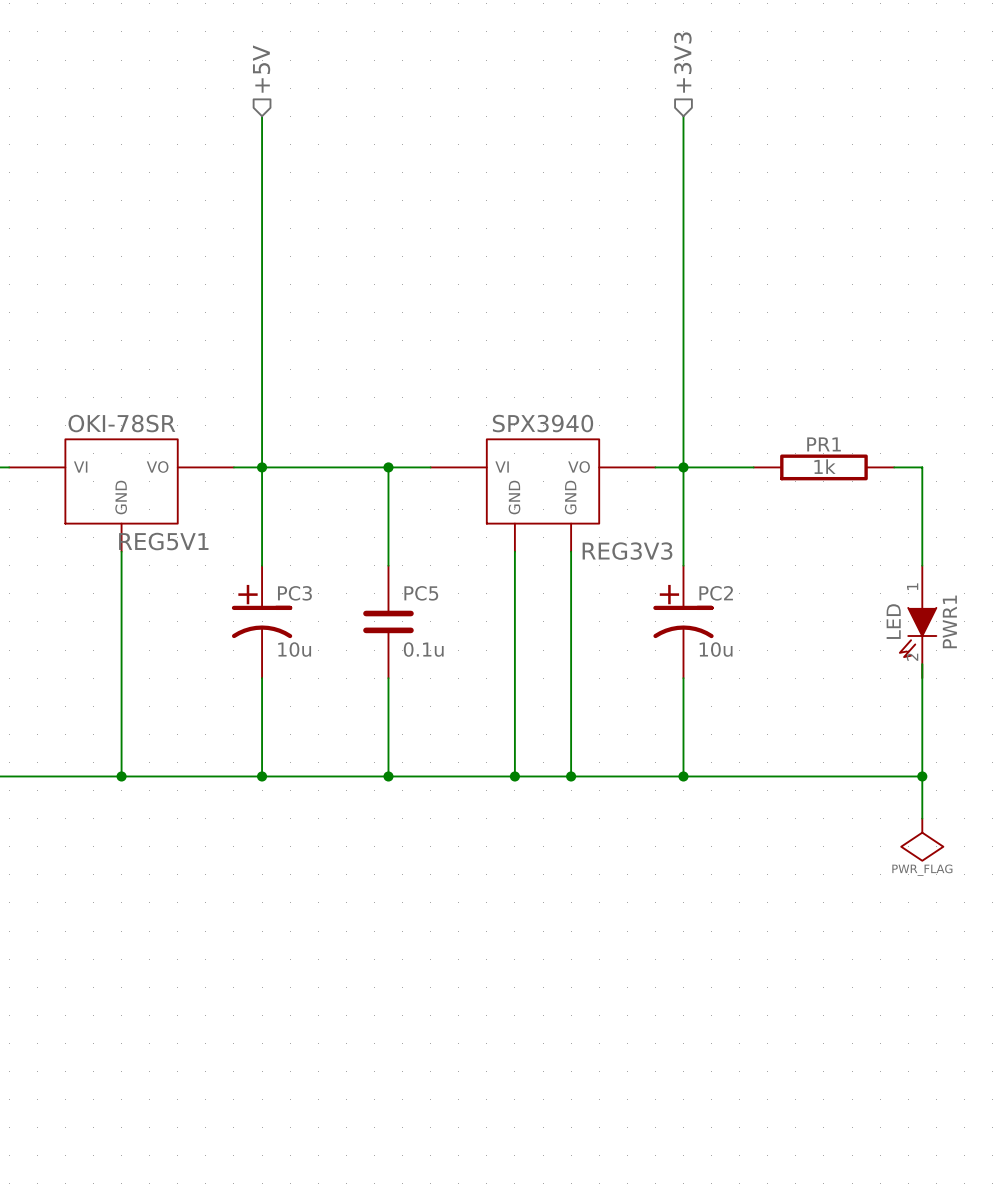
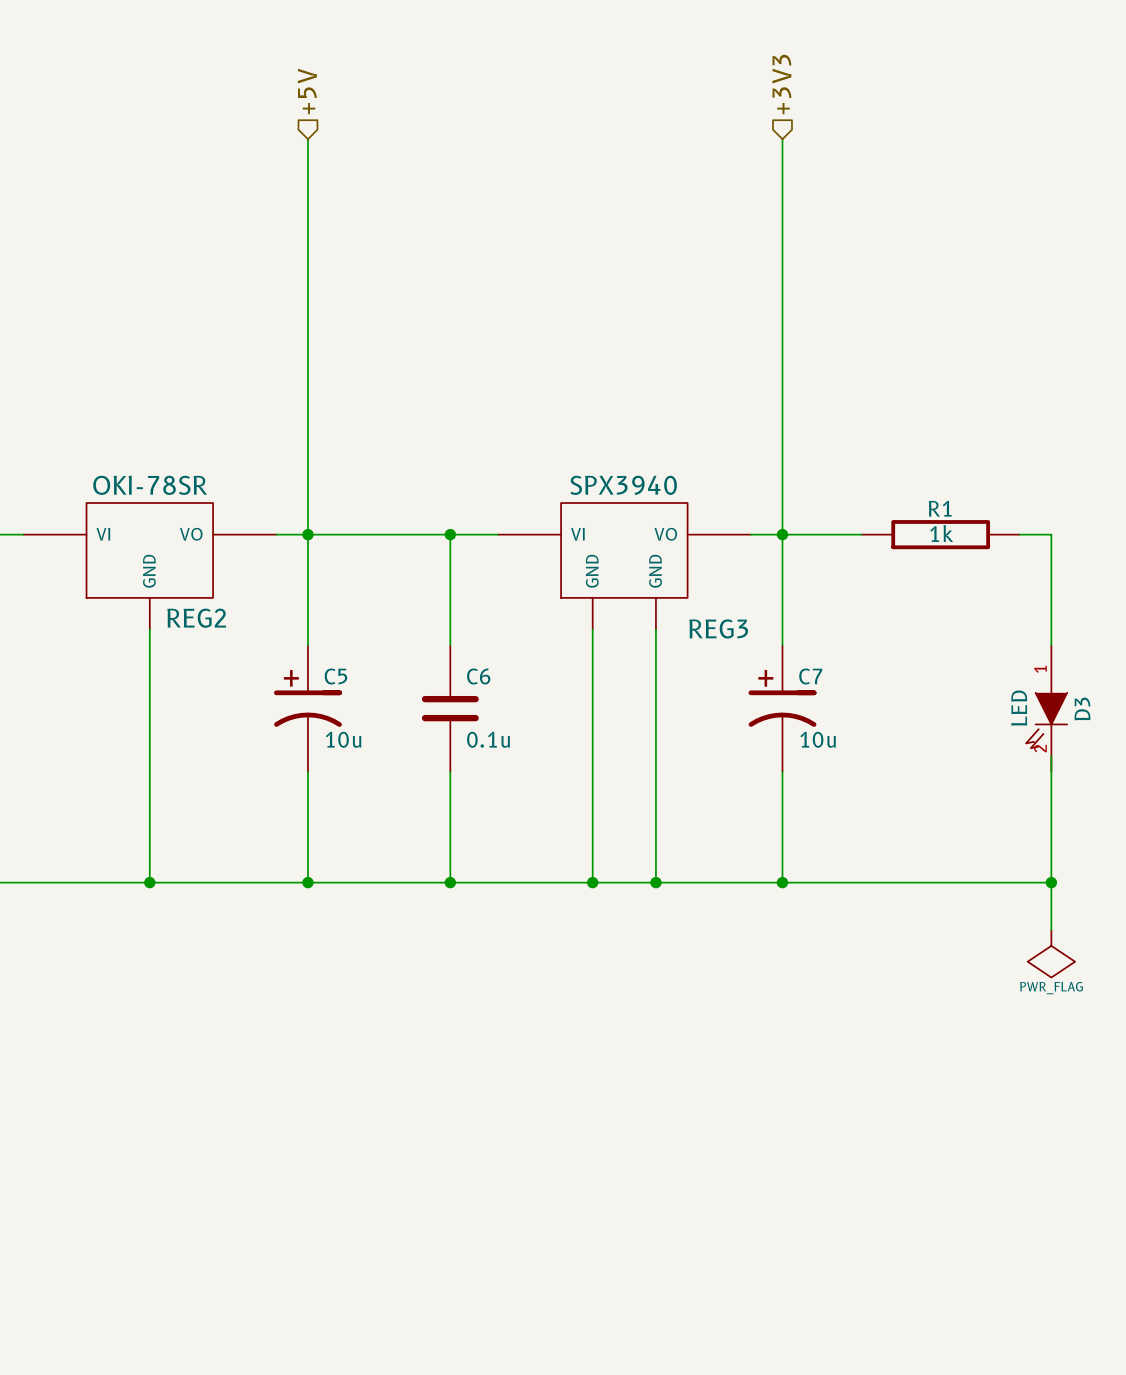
PR1 name: PR1 (824, 444) -> R1 (940, 508)
REG5V1 name: REG5V1 (163, 541) -> REG2 (196, 618)
REG3V3 name: REG3V3 (627, 551) -> REG3 (718, 628)
PC3 name: PC3 (294, 593) -> C5 (335, 676)
PC5 name: PC5 (421, 593) -> C6 (478, 676)
PC2 name: PC2 (716, 593) -> C7 (810, 676)
PWR1 name: PWR1 (949, 621) -> D3 (1082, 709)

